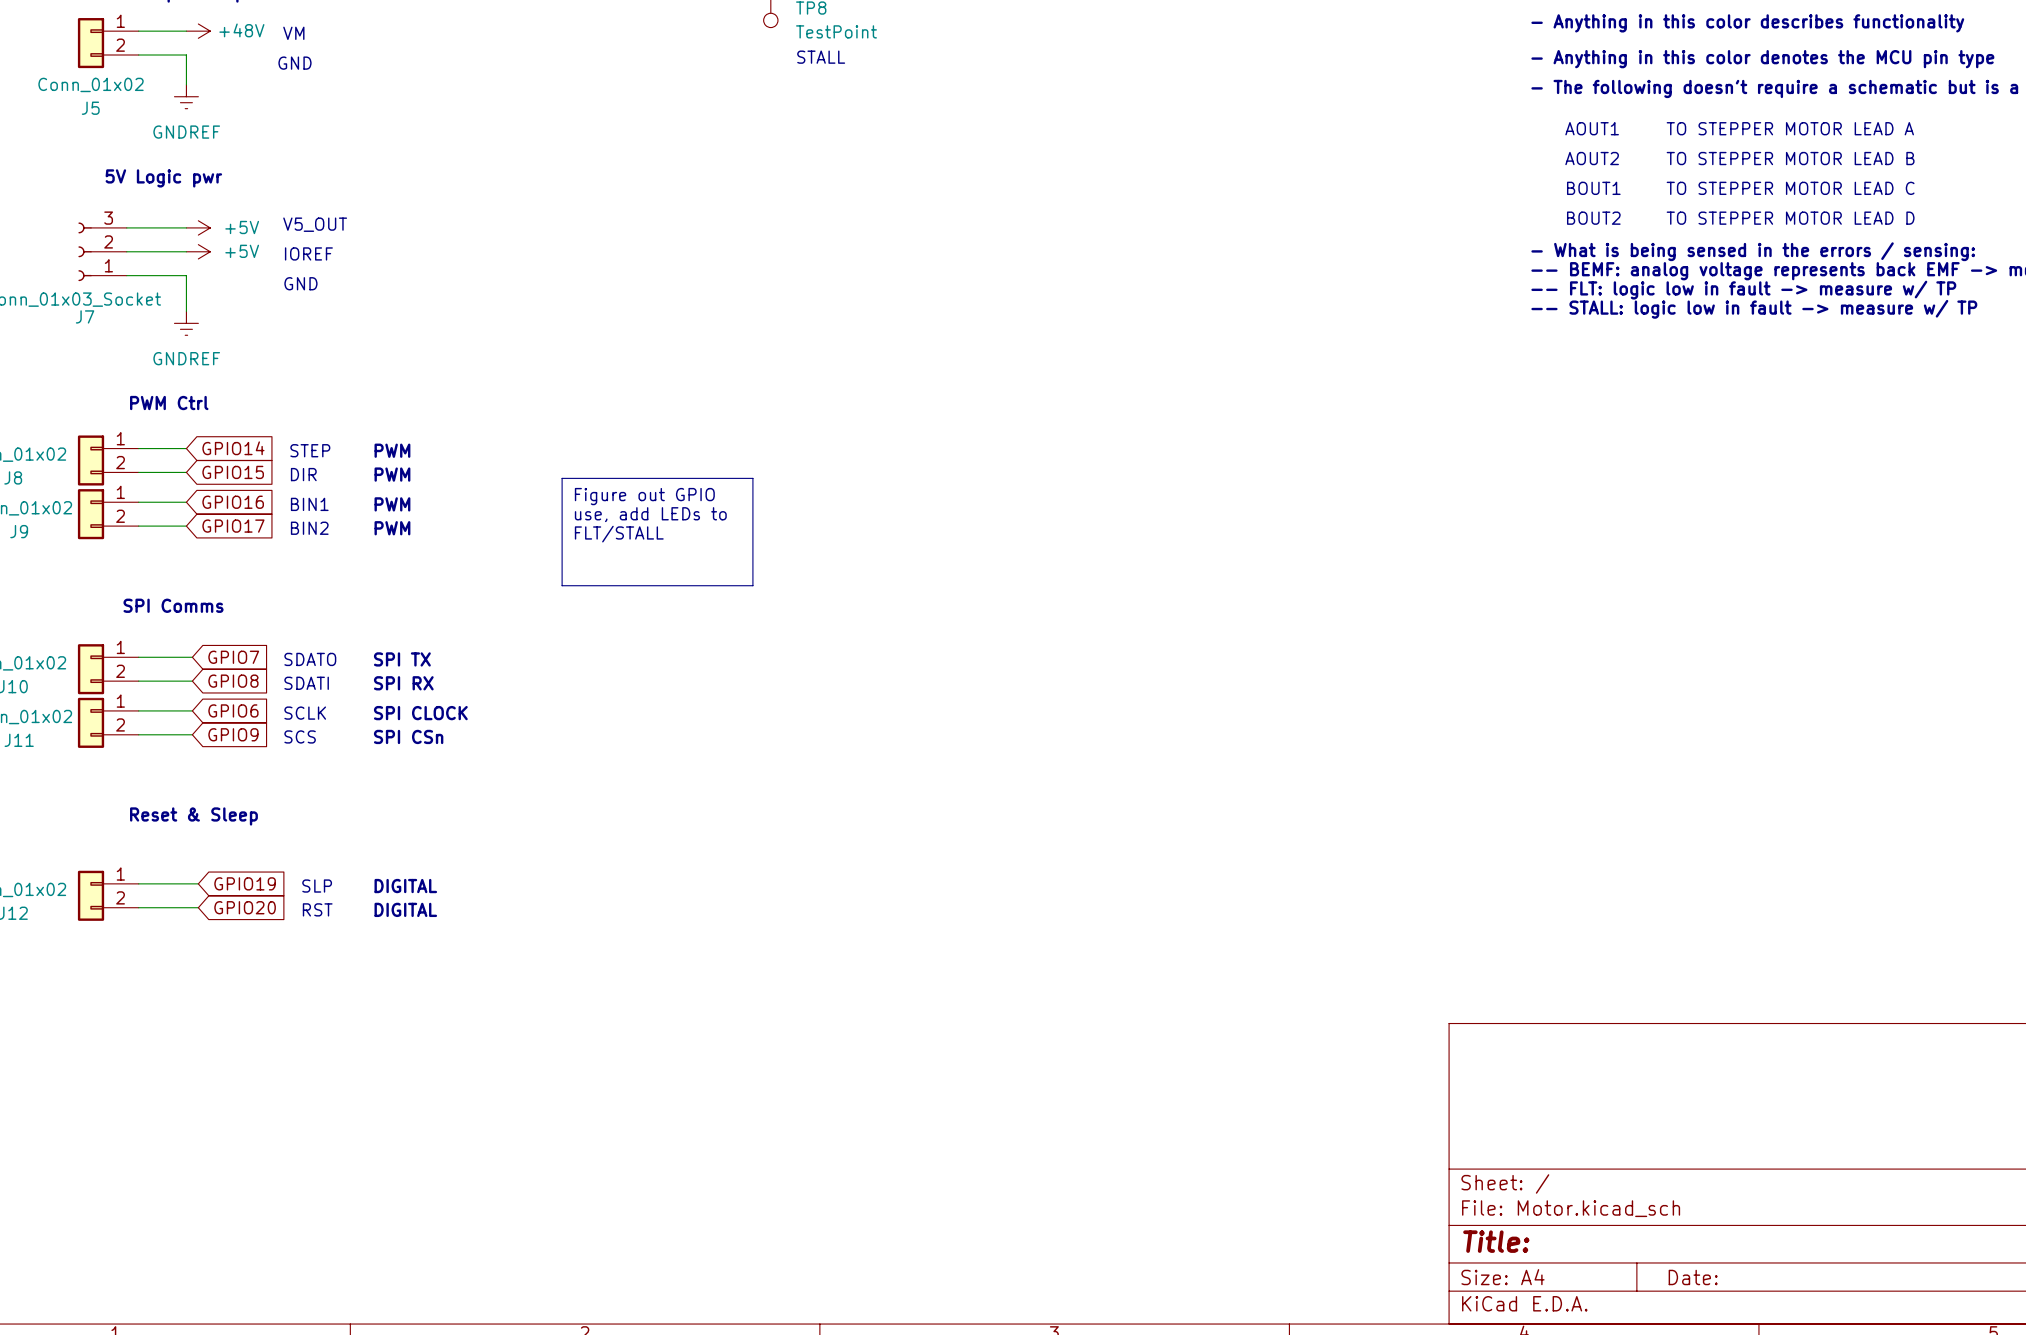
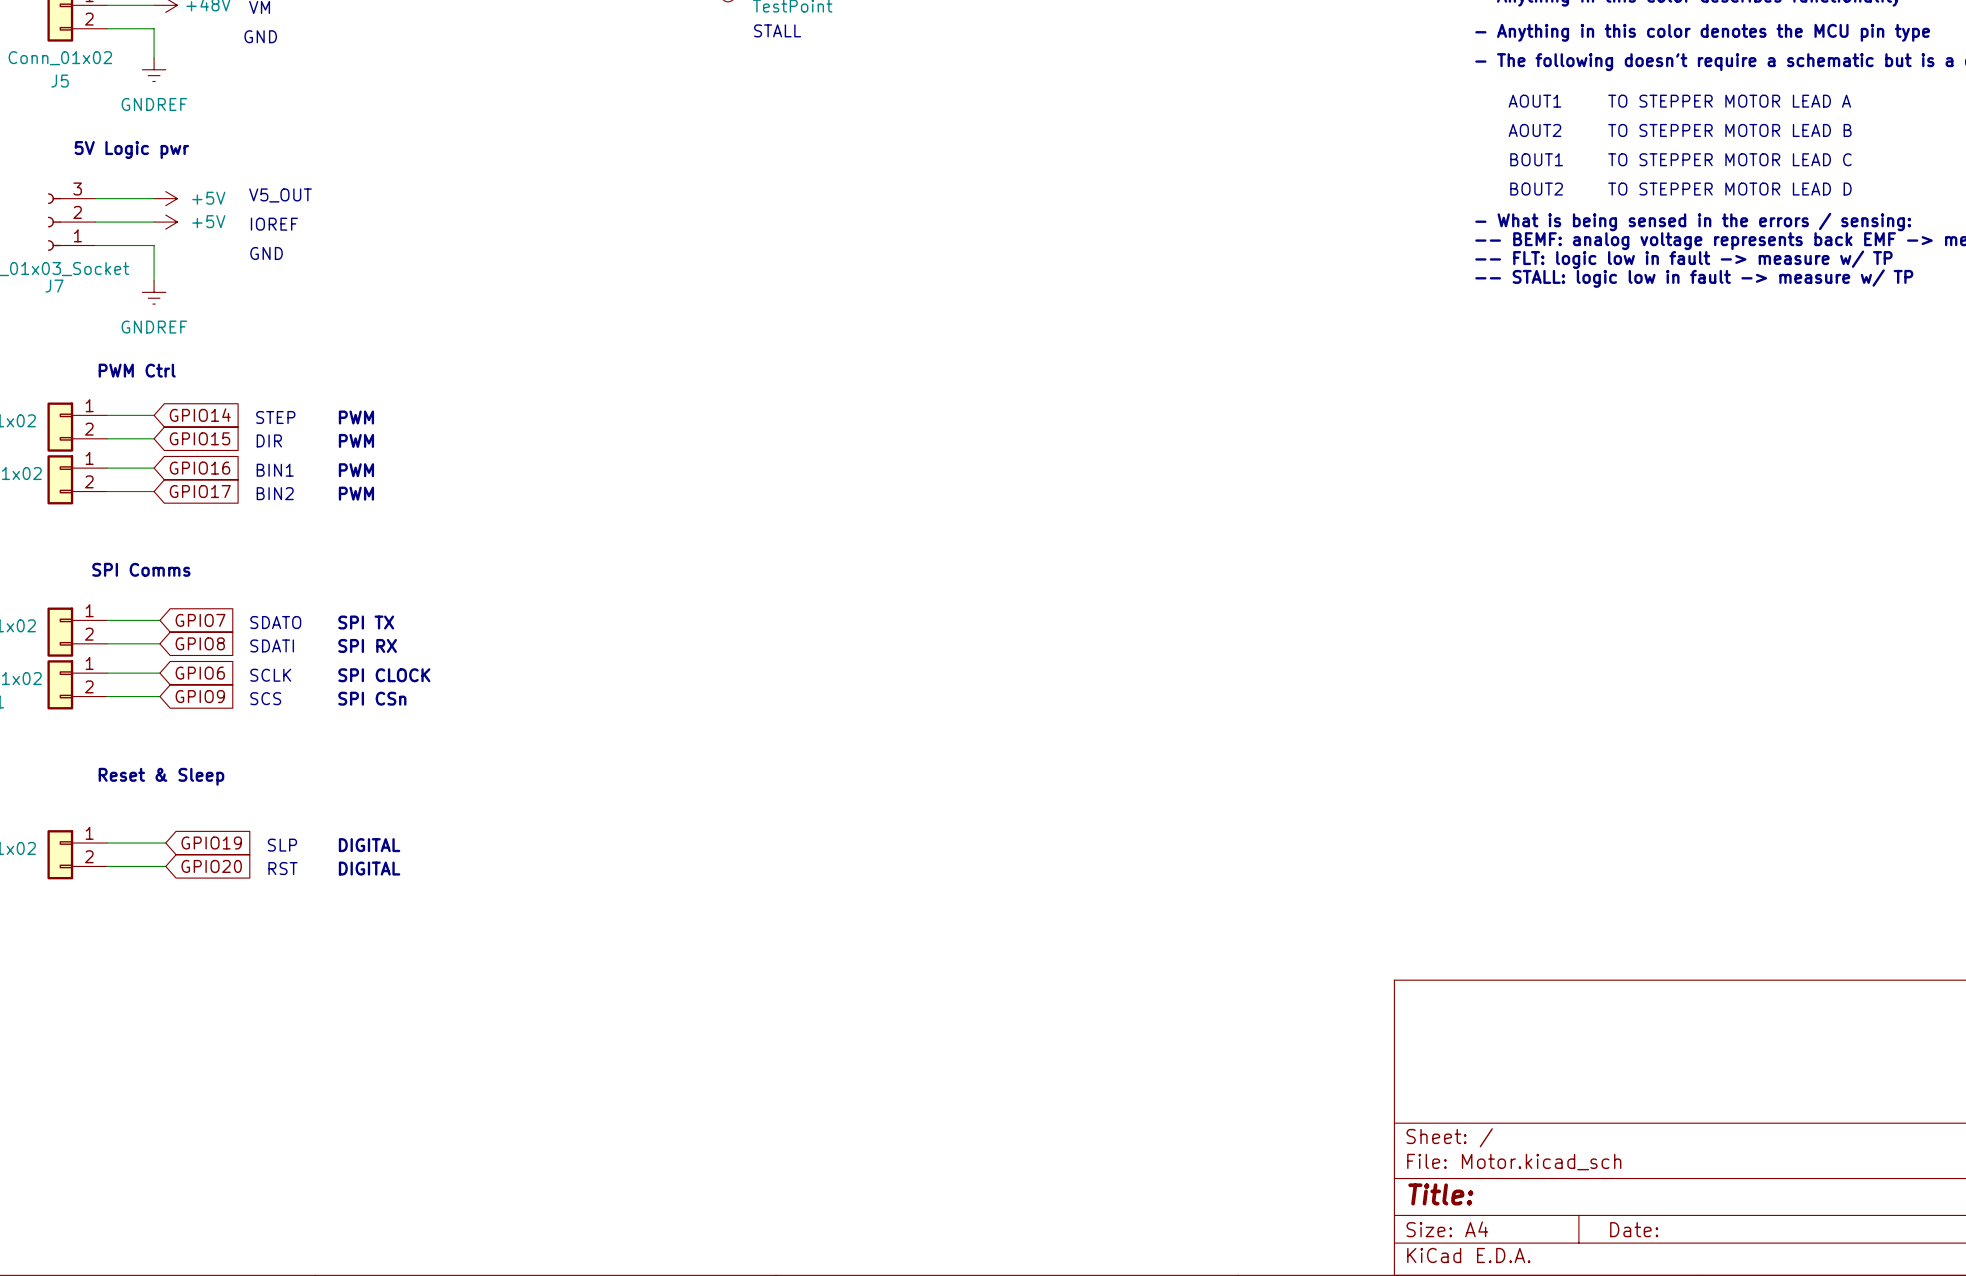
line: (562, 478) (752, 478) (752, 585) (562, 585) (562, 478) -> none
text: Figure out GPIO (644, 496) -> none
text: use, add LEDs to (650, 514) -> none
text: FLT/STALL (619, 534) -> none

